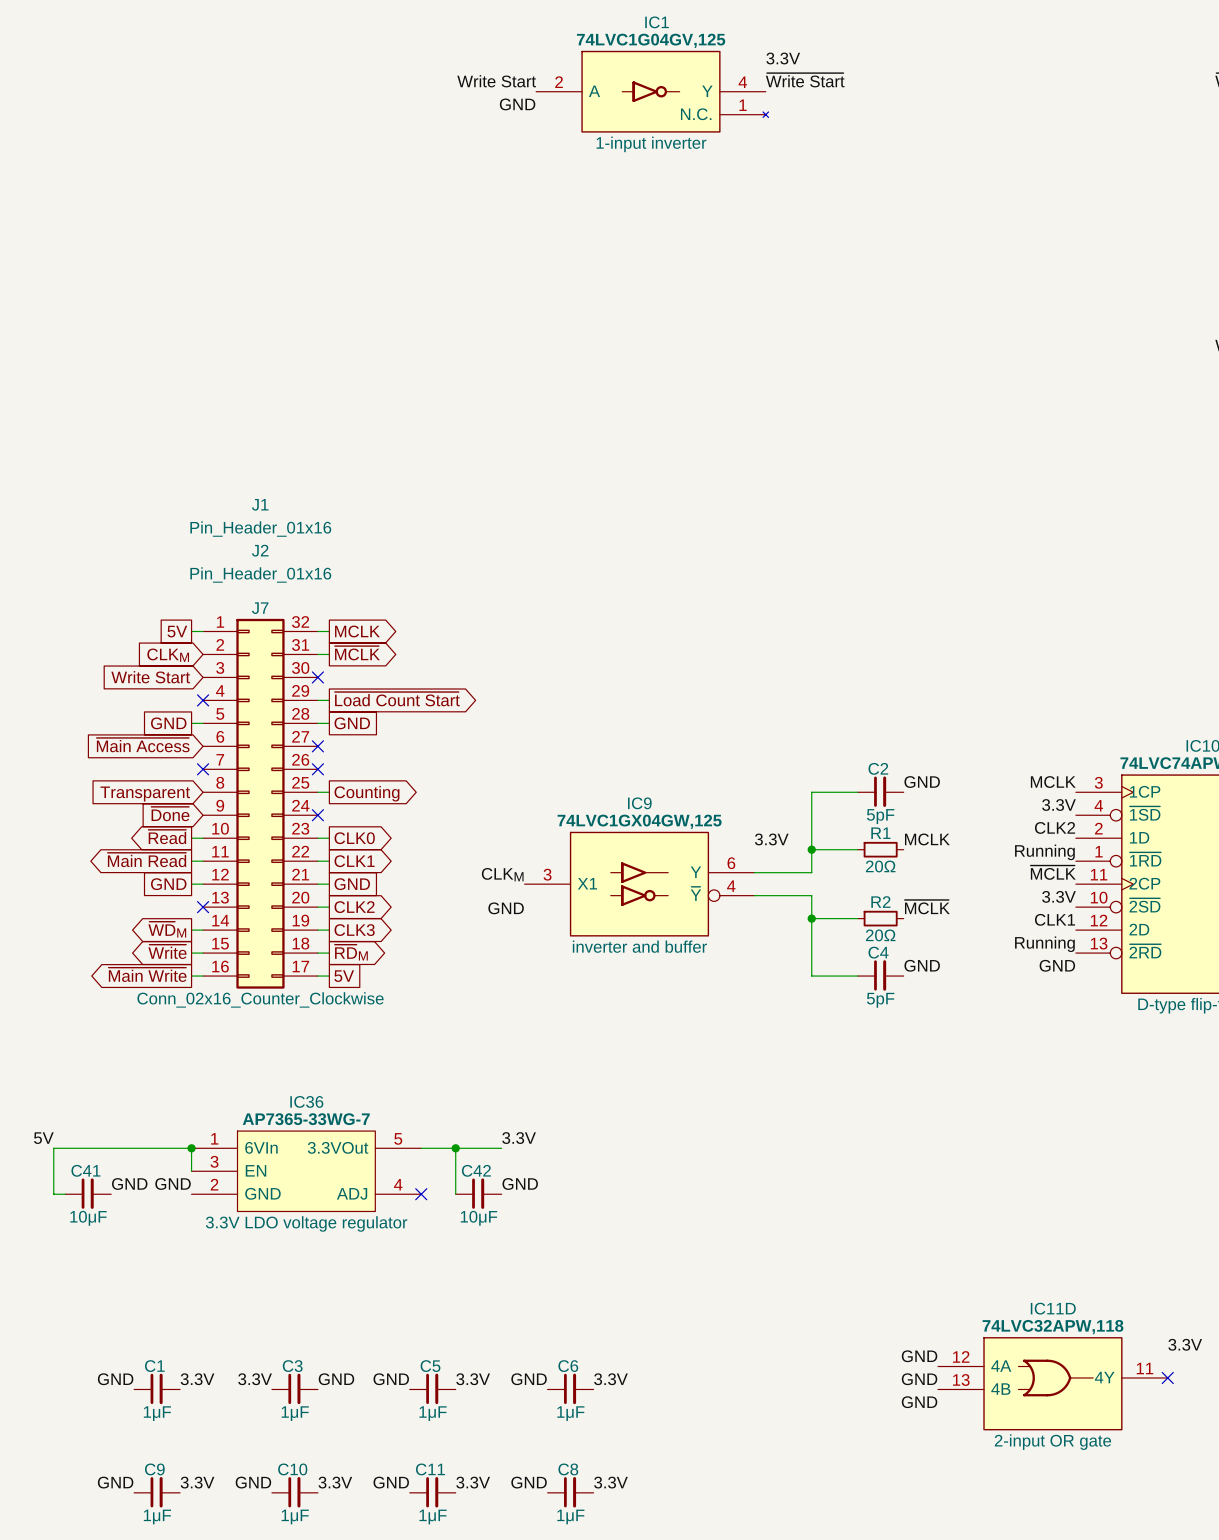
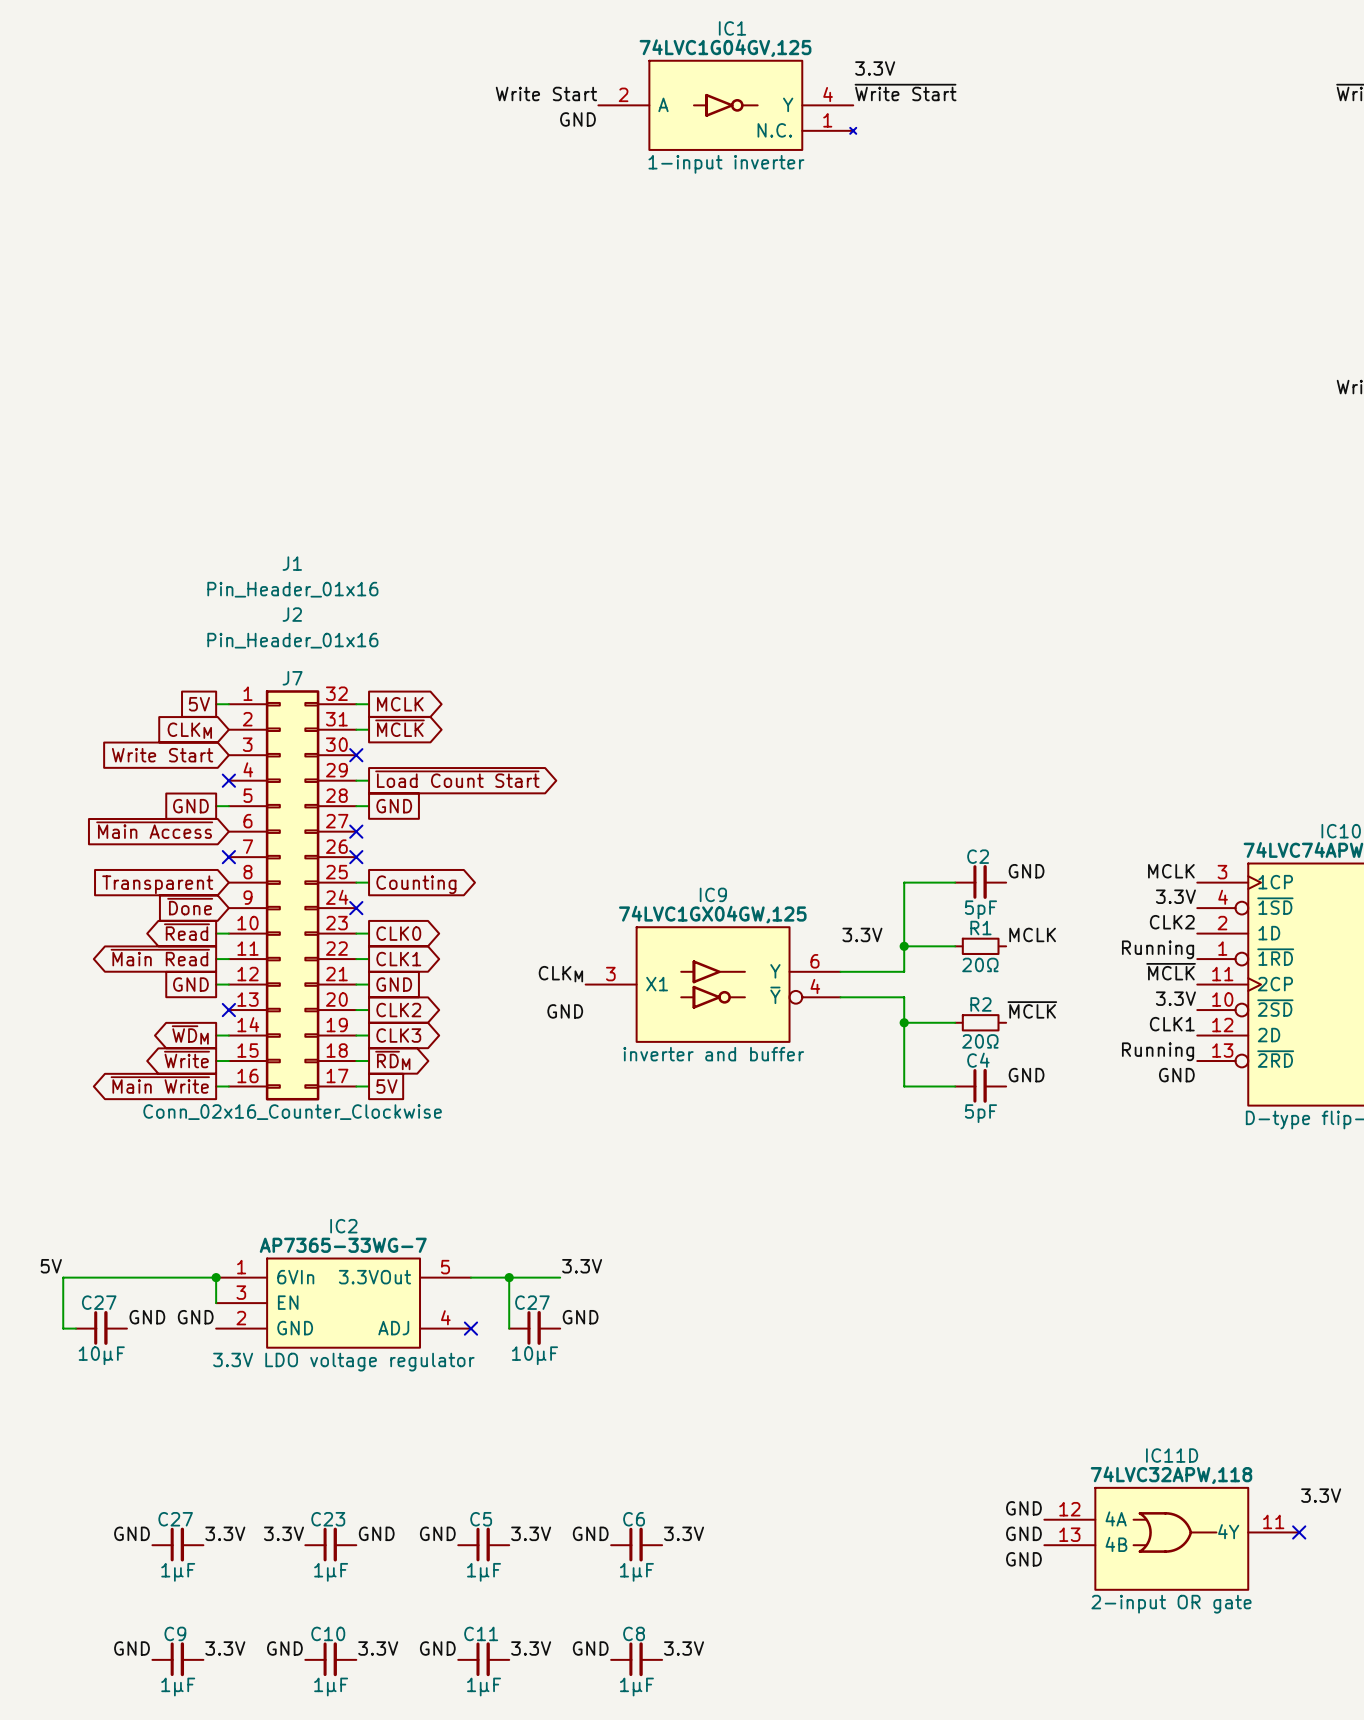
IC36 name: IC36 (306, 1101) -> IC2 (343, 1226)
C41 name: C41 (85, 1170) -> C27 (99, 1302)
C42 name: C42 (476, 1170) -> C27 (532, 1302)
C1 name: C1 (154, 1366) -> C27 (175, 1519)
C3 name: C3 (292, 1366) -> C23 (328, 1519)

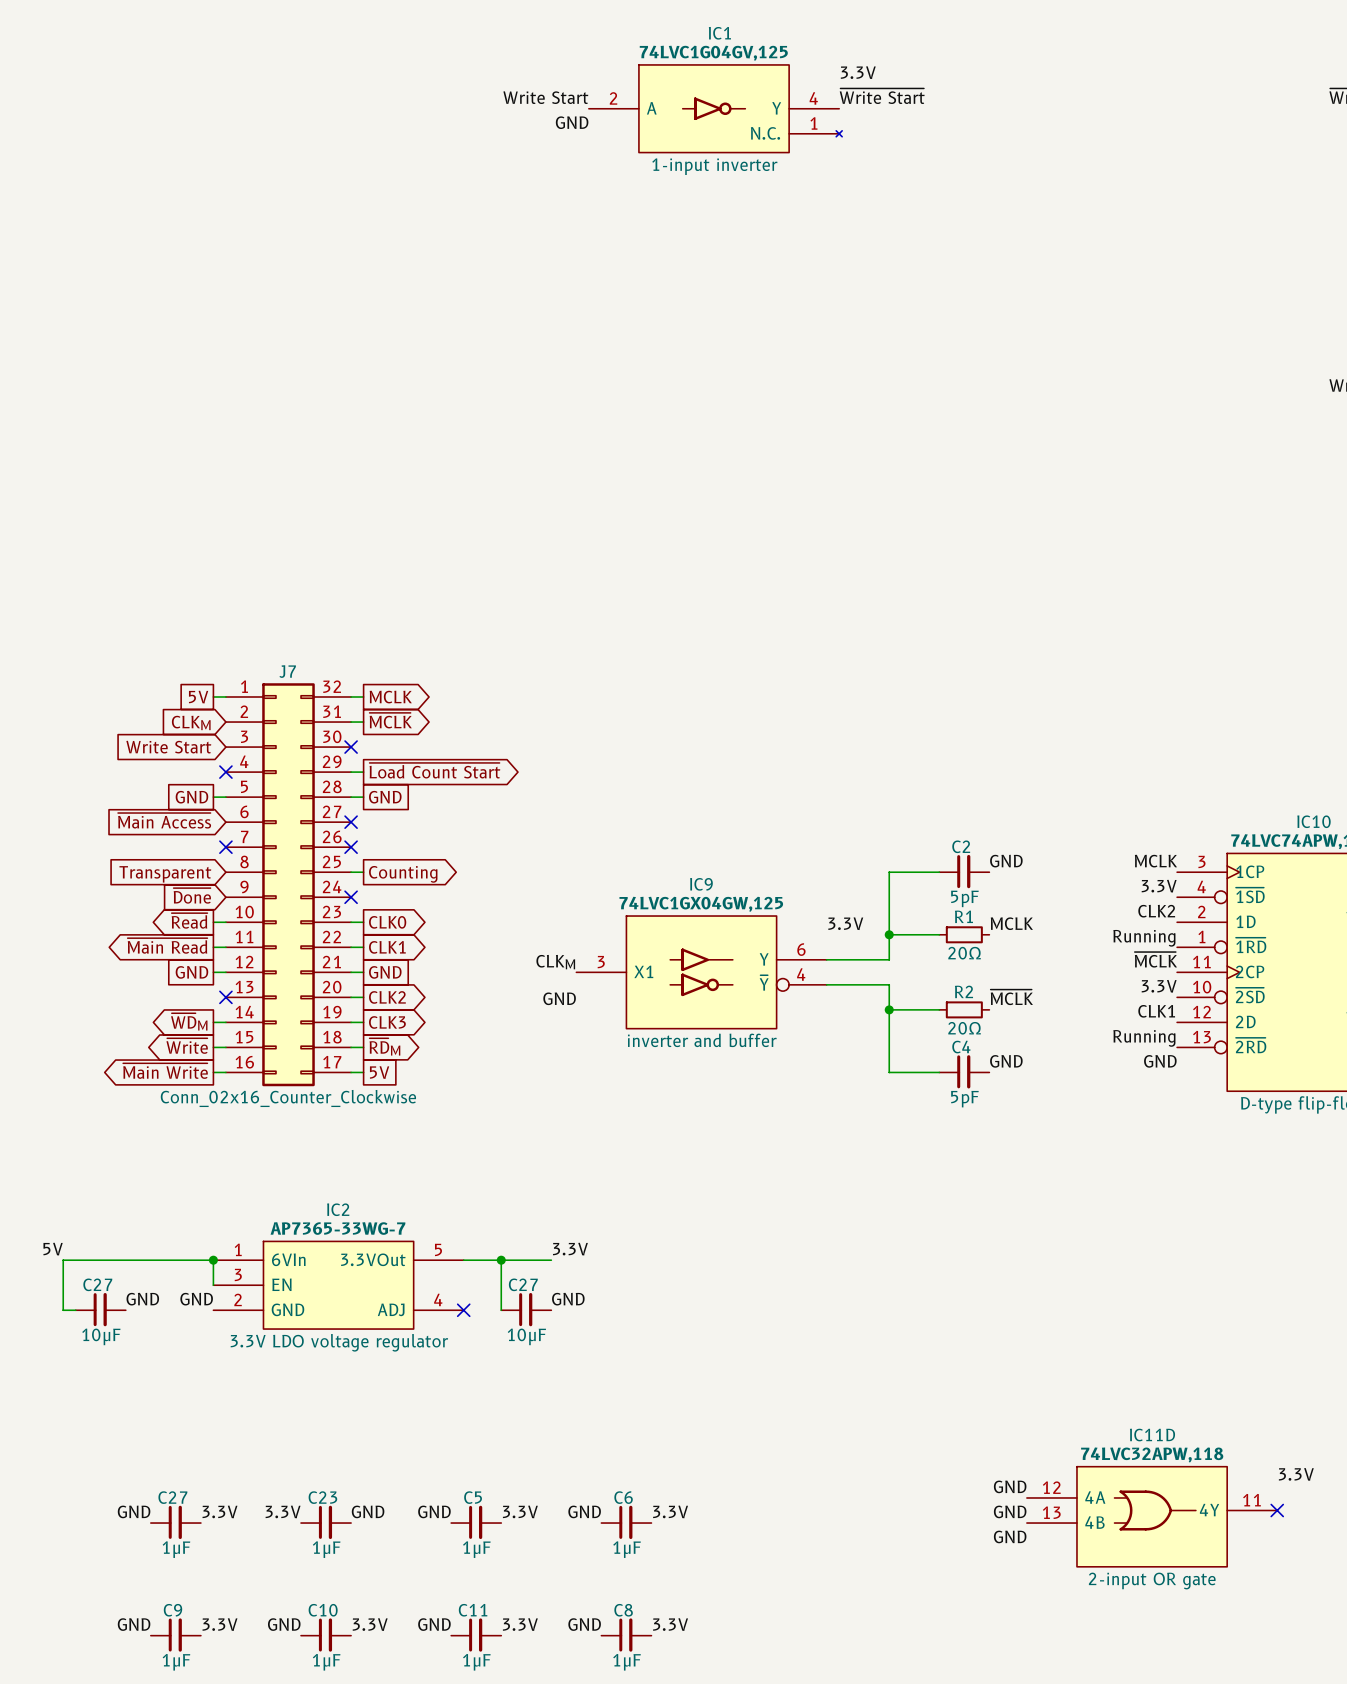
J1: Pin_Header_01x16 (292, 576) -> none
J2: Pin_Header_01x16 (292, 627) -> none

